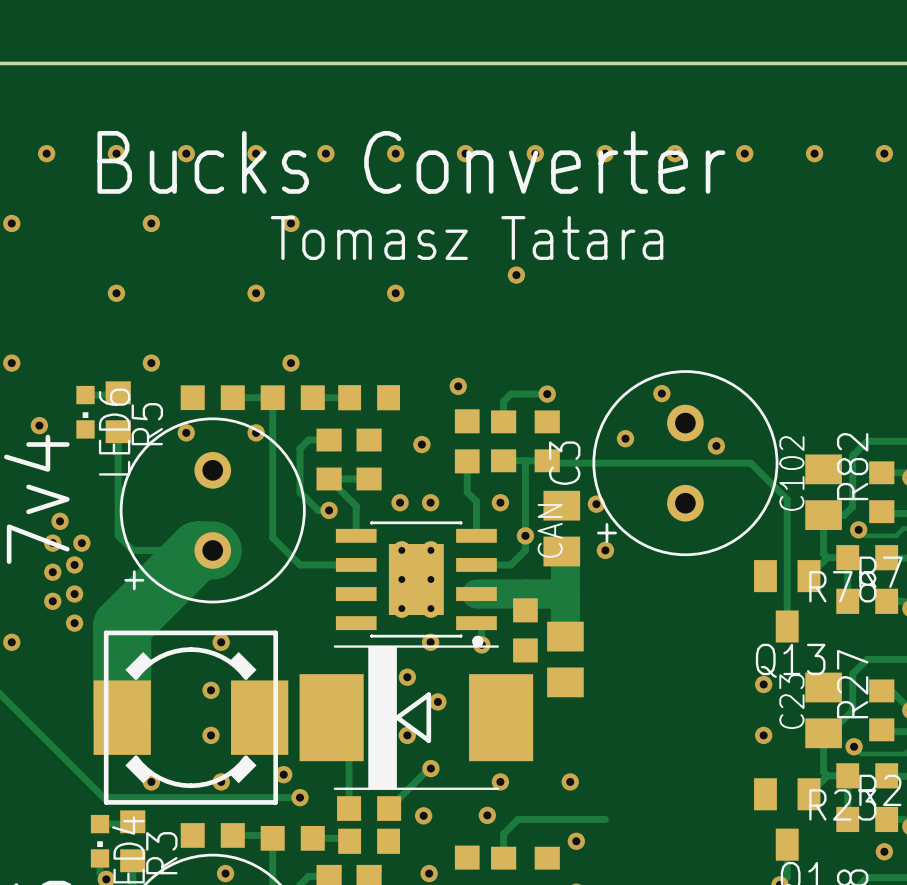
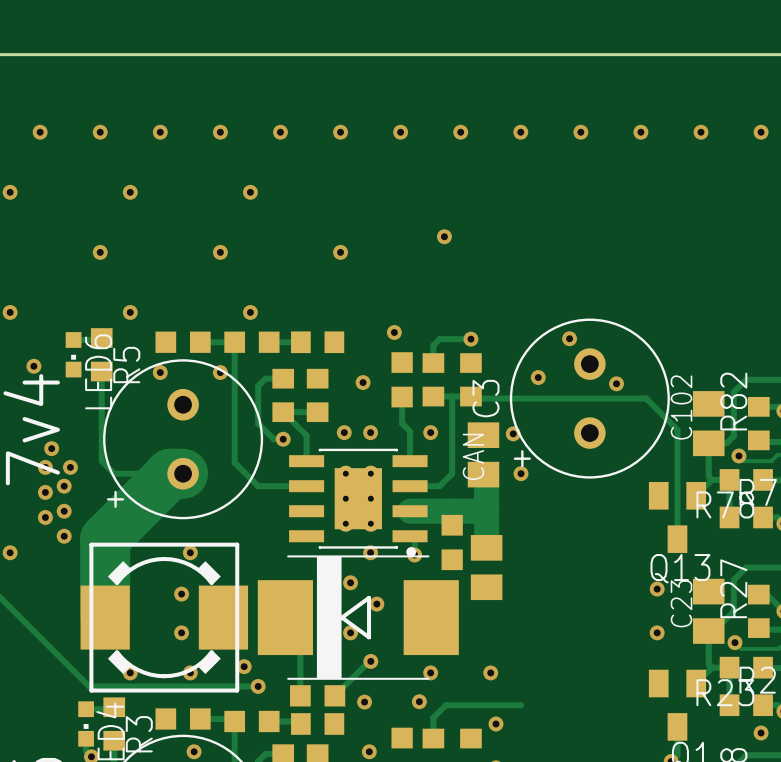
text: Bucks Converter (411, 162) -> none
text: Tomasz Tatara (467, 238) -> none
via: (525, 535) -> none

